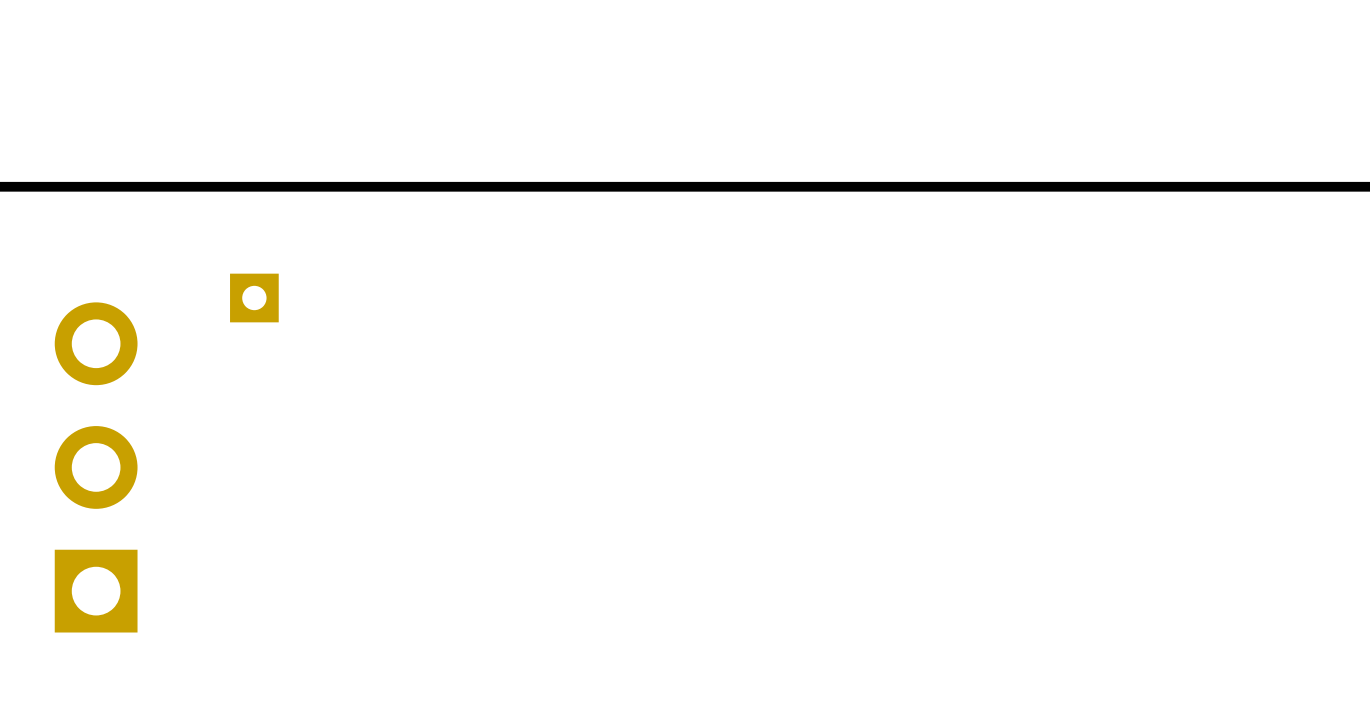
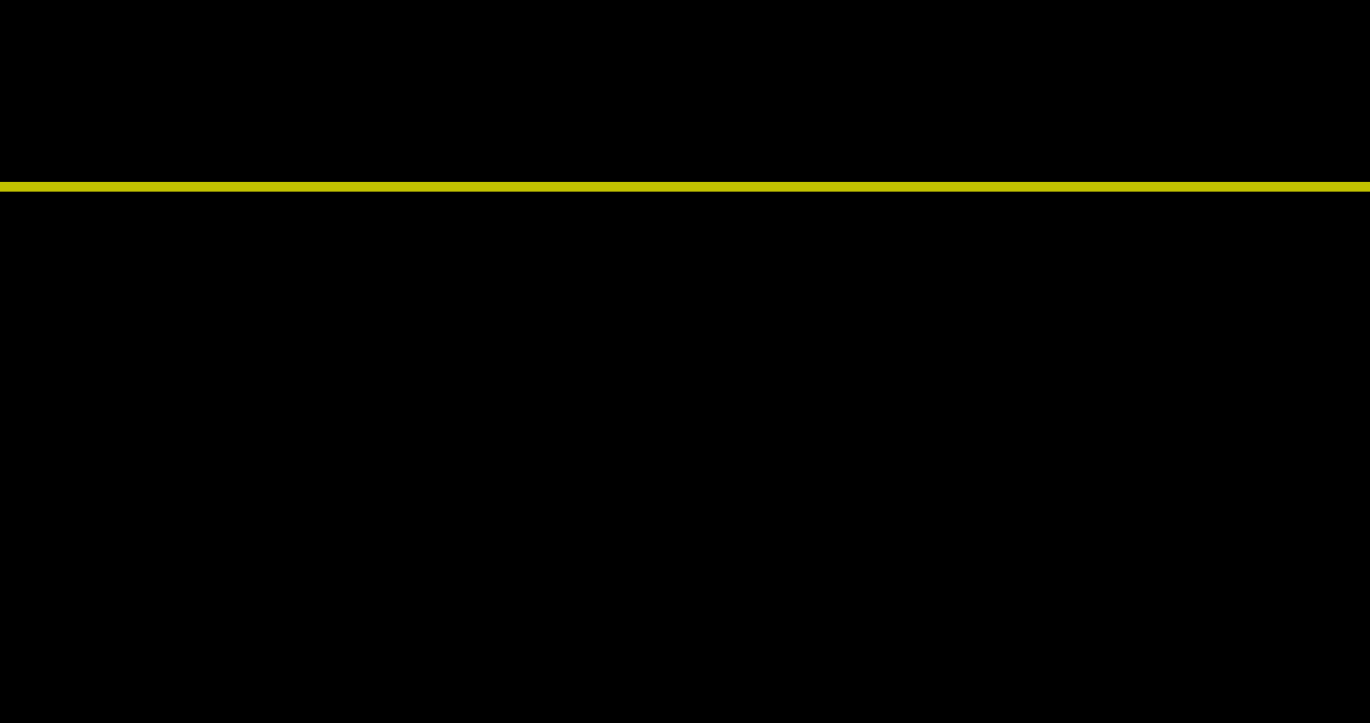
part: (254, 298) -> none
part: (96, 467) -> none

